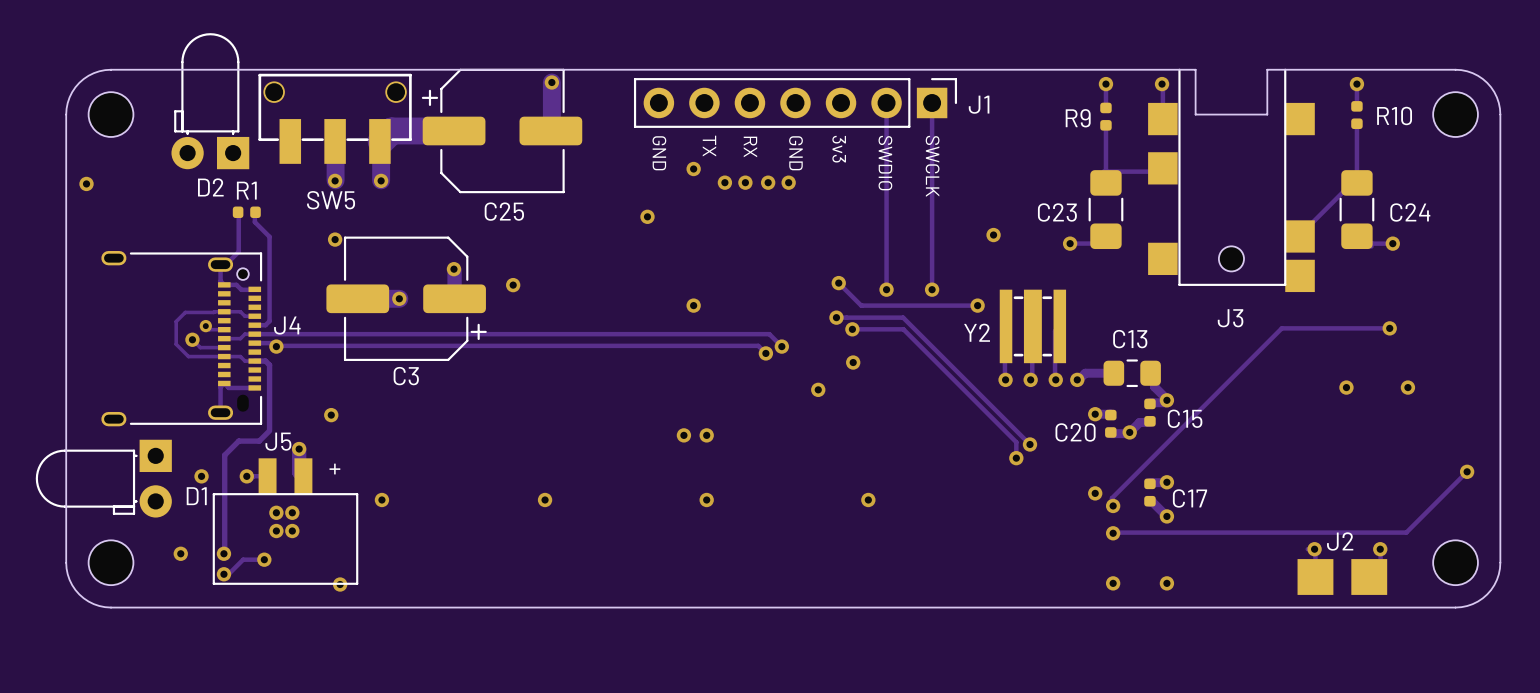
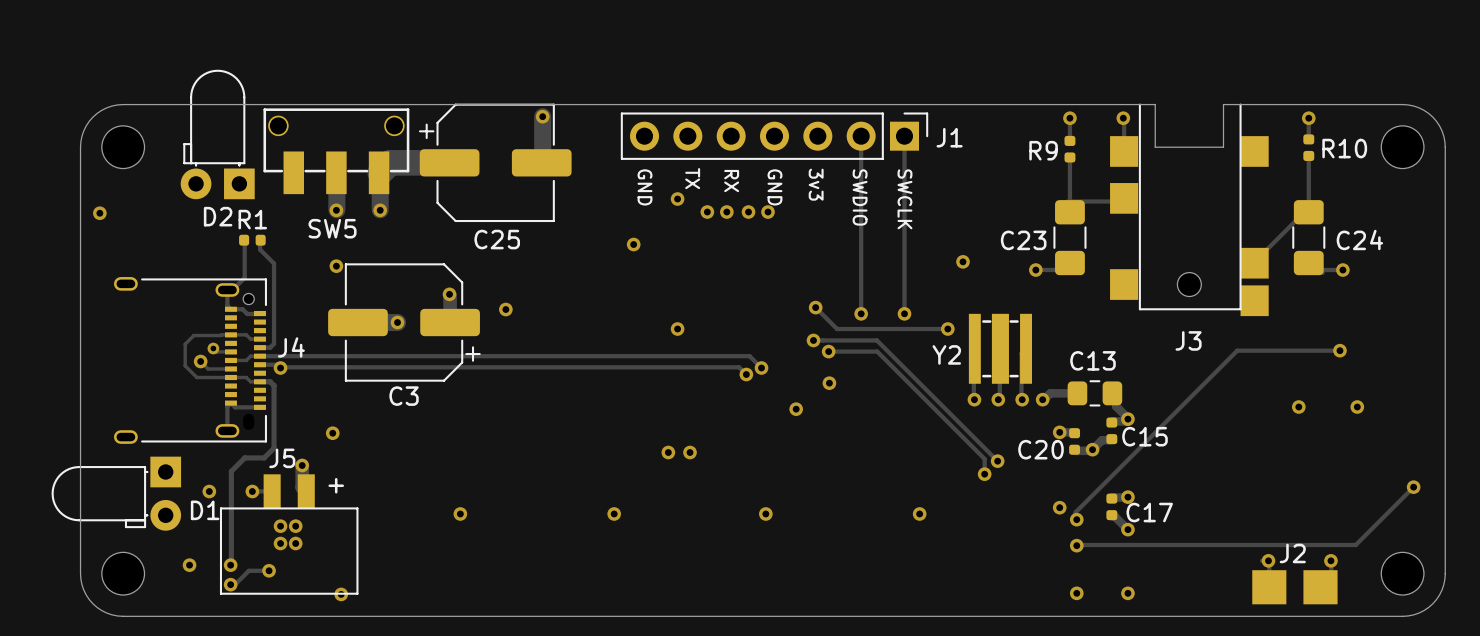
via: (381, 499) -> none
via: none -> (460, 513)
via: (545, 499) -> none
via: none -> (614, 513)
via: (706, 499) -> none
via: none -> (765, 513)
via: (868, 499) -> none
via: none -> (919, 513)

